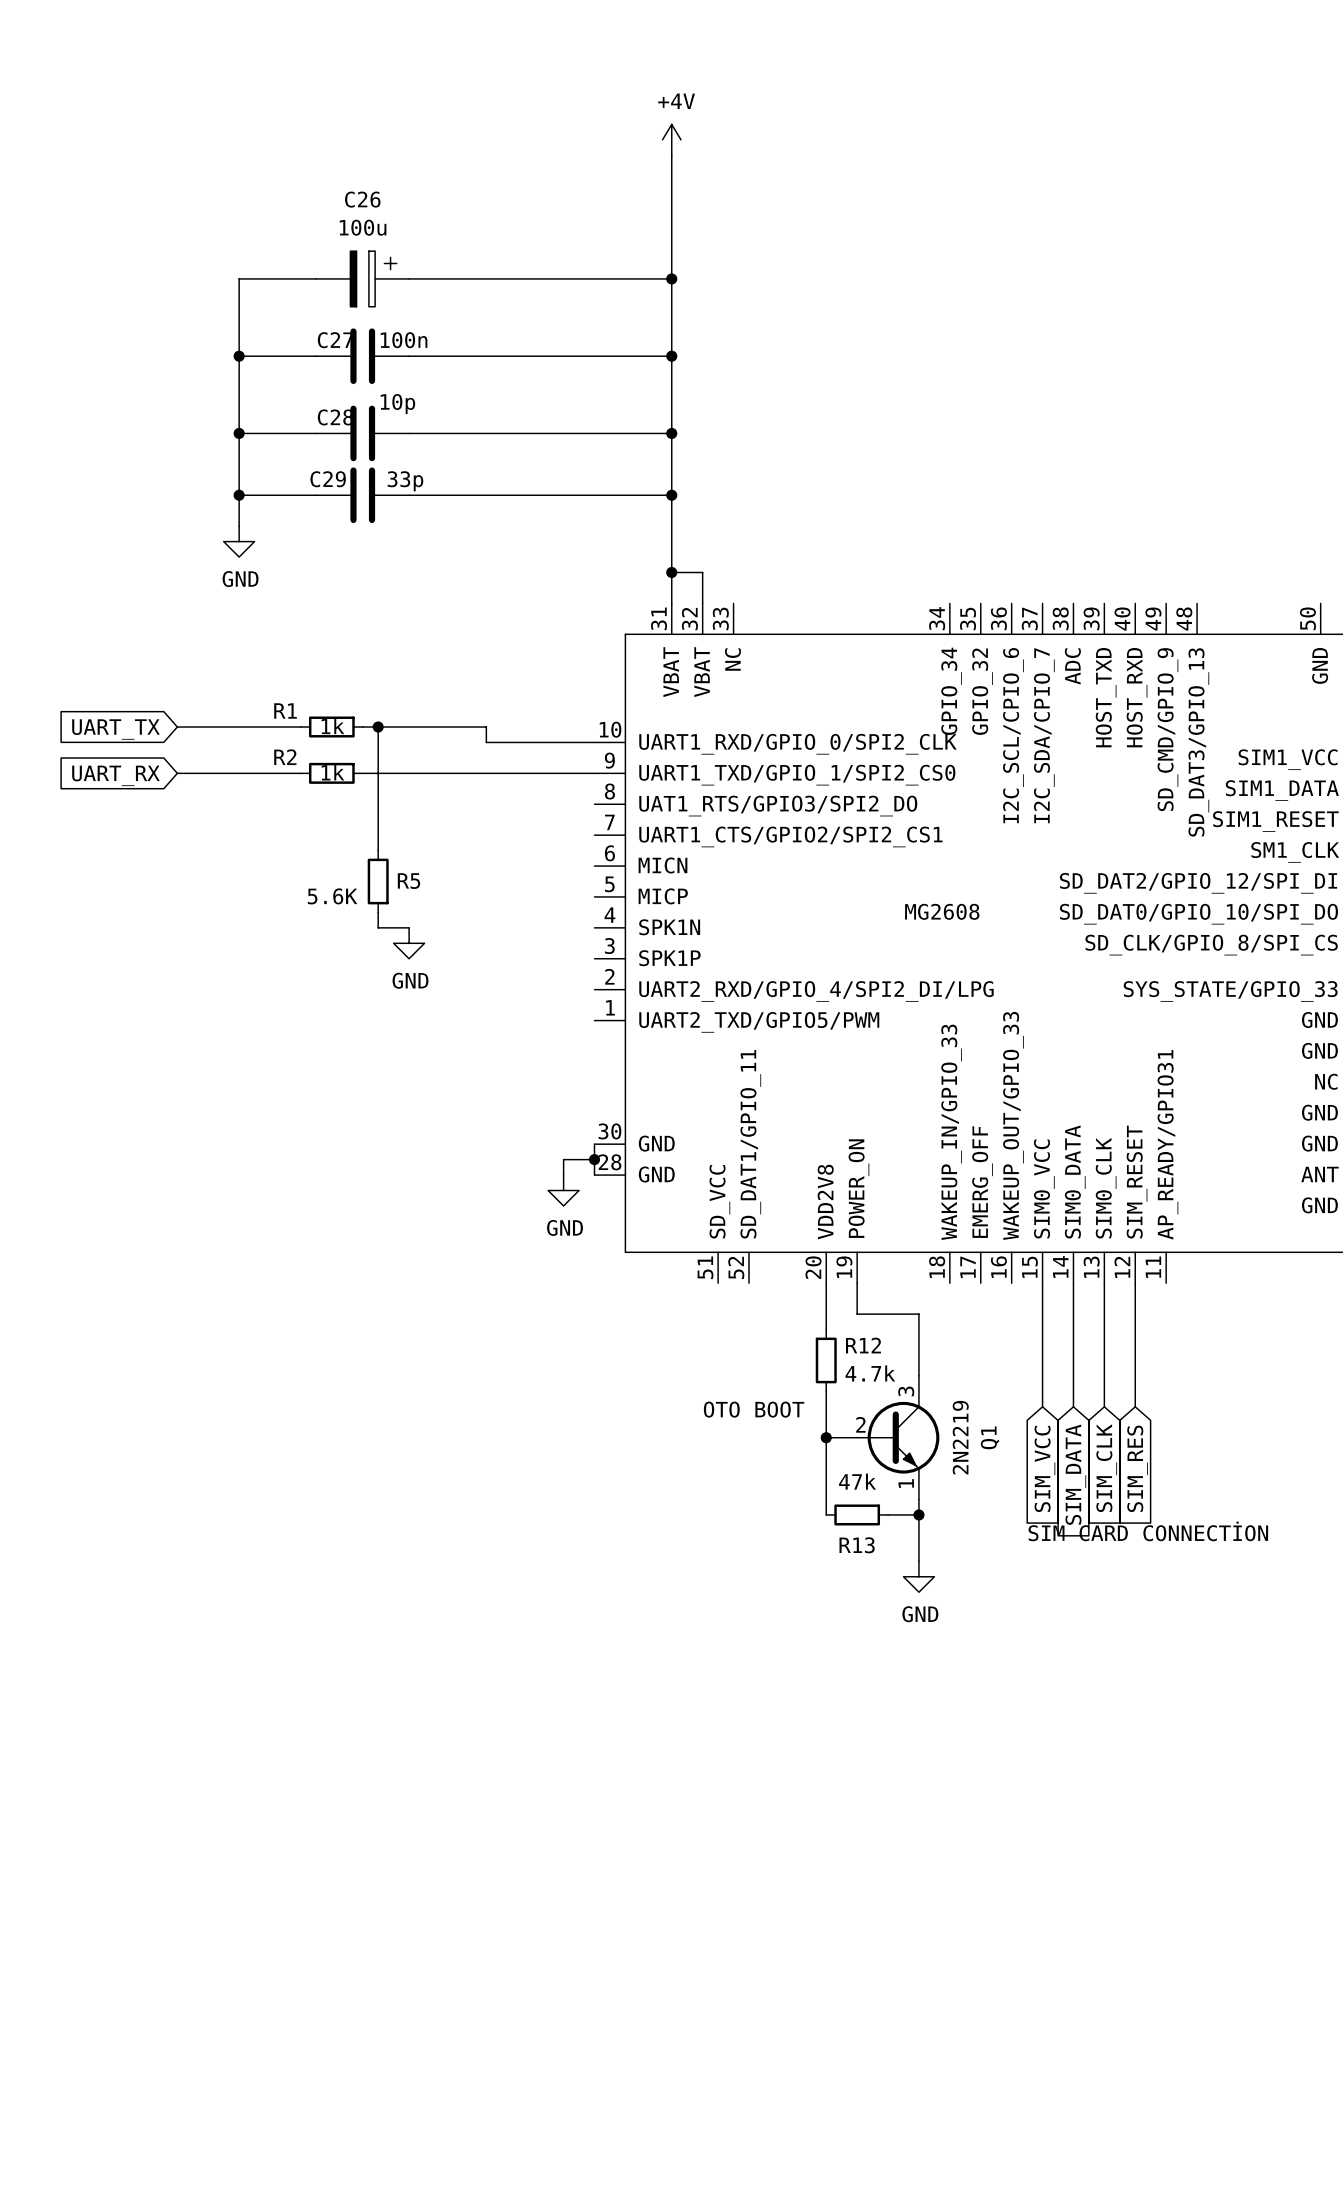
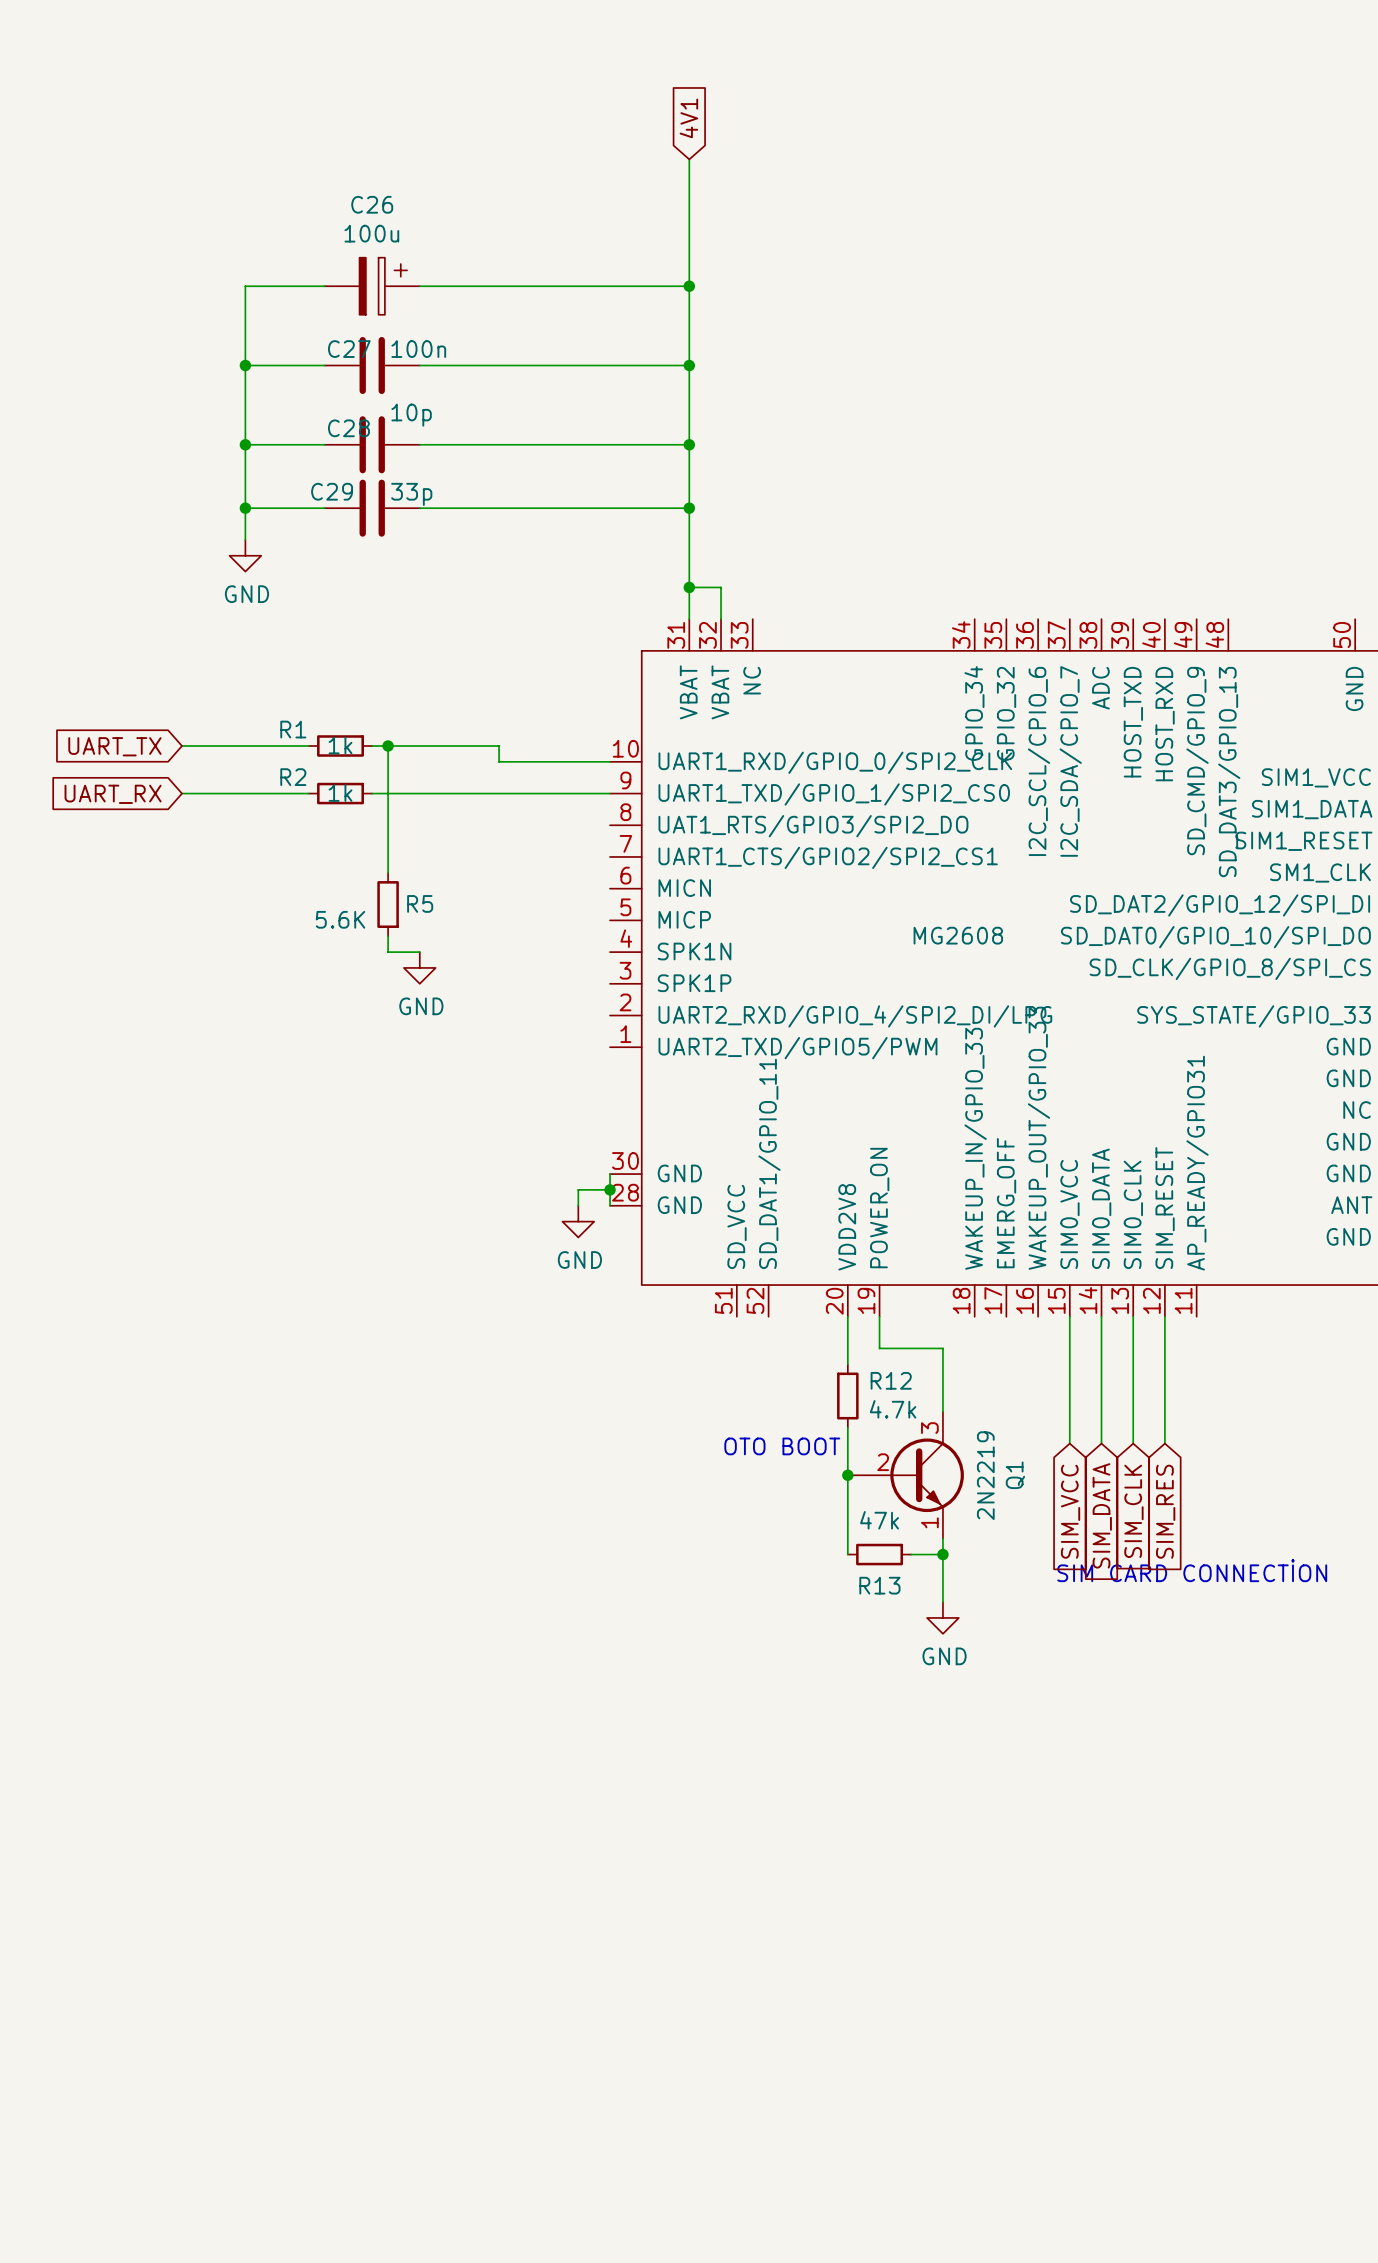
global label: none -> 4V1 (688, 118)
power symbol: +4V (671, 139) -> none

